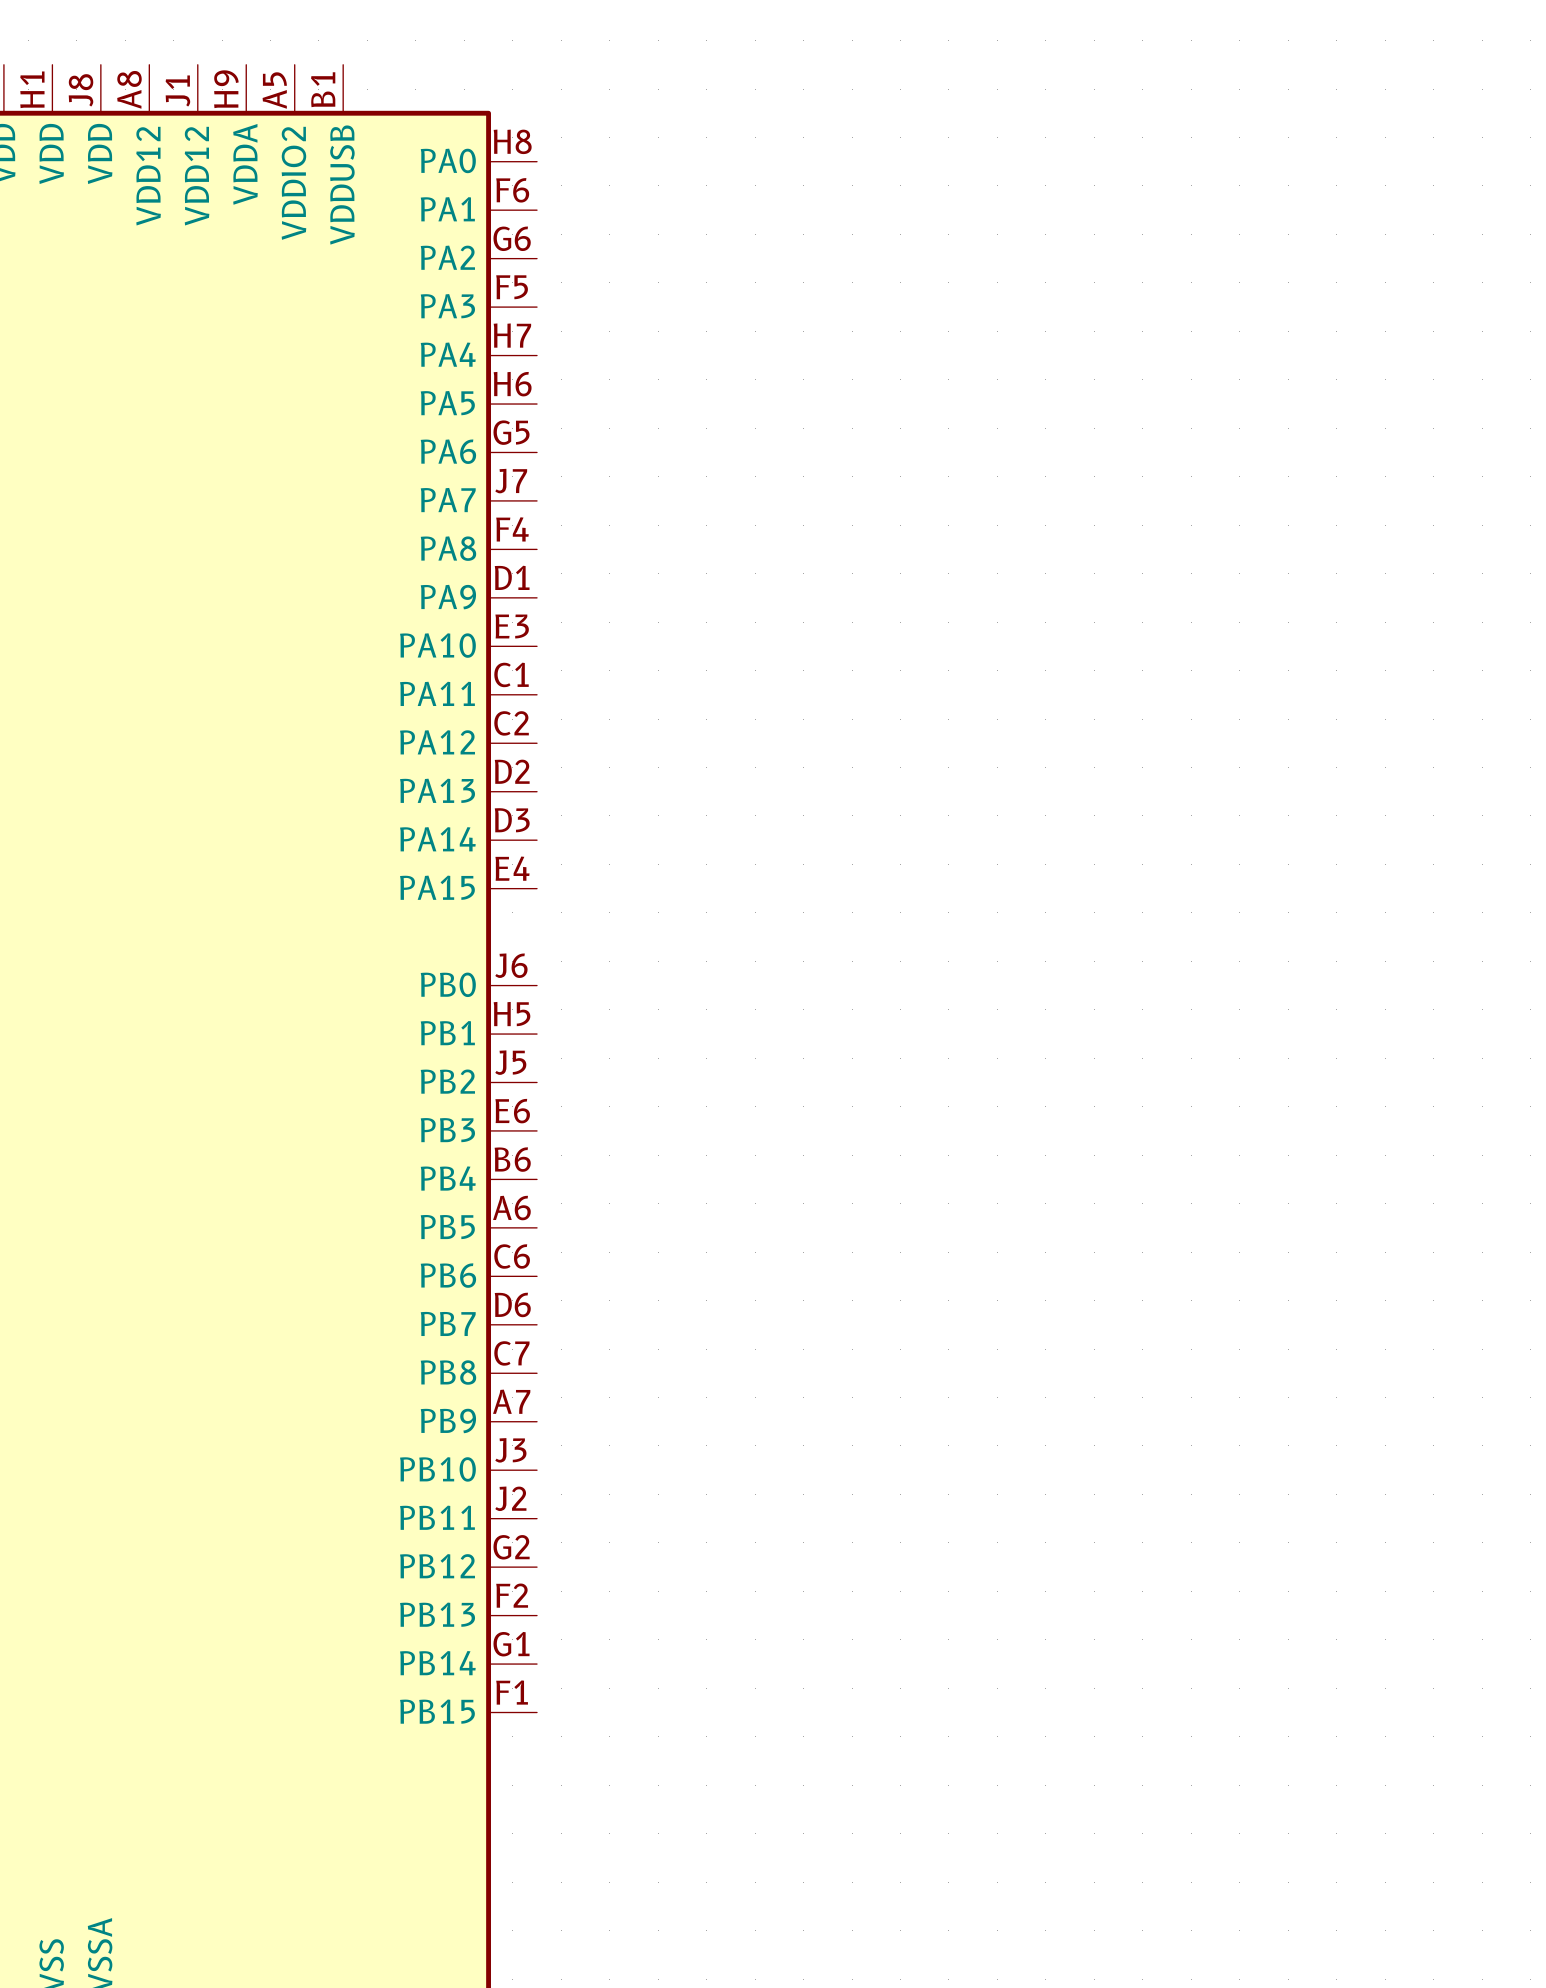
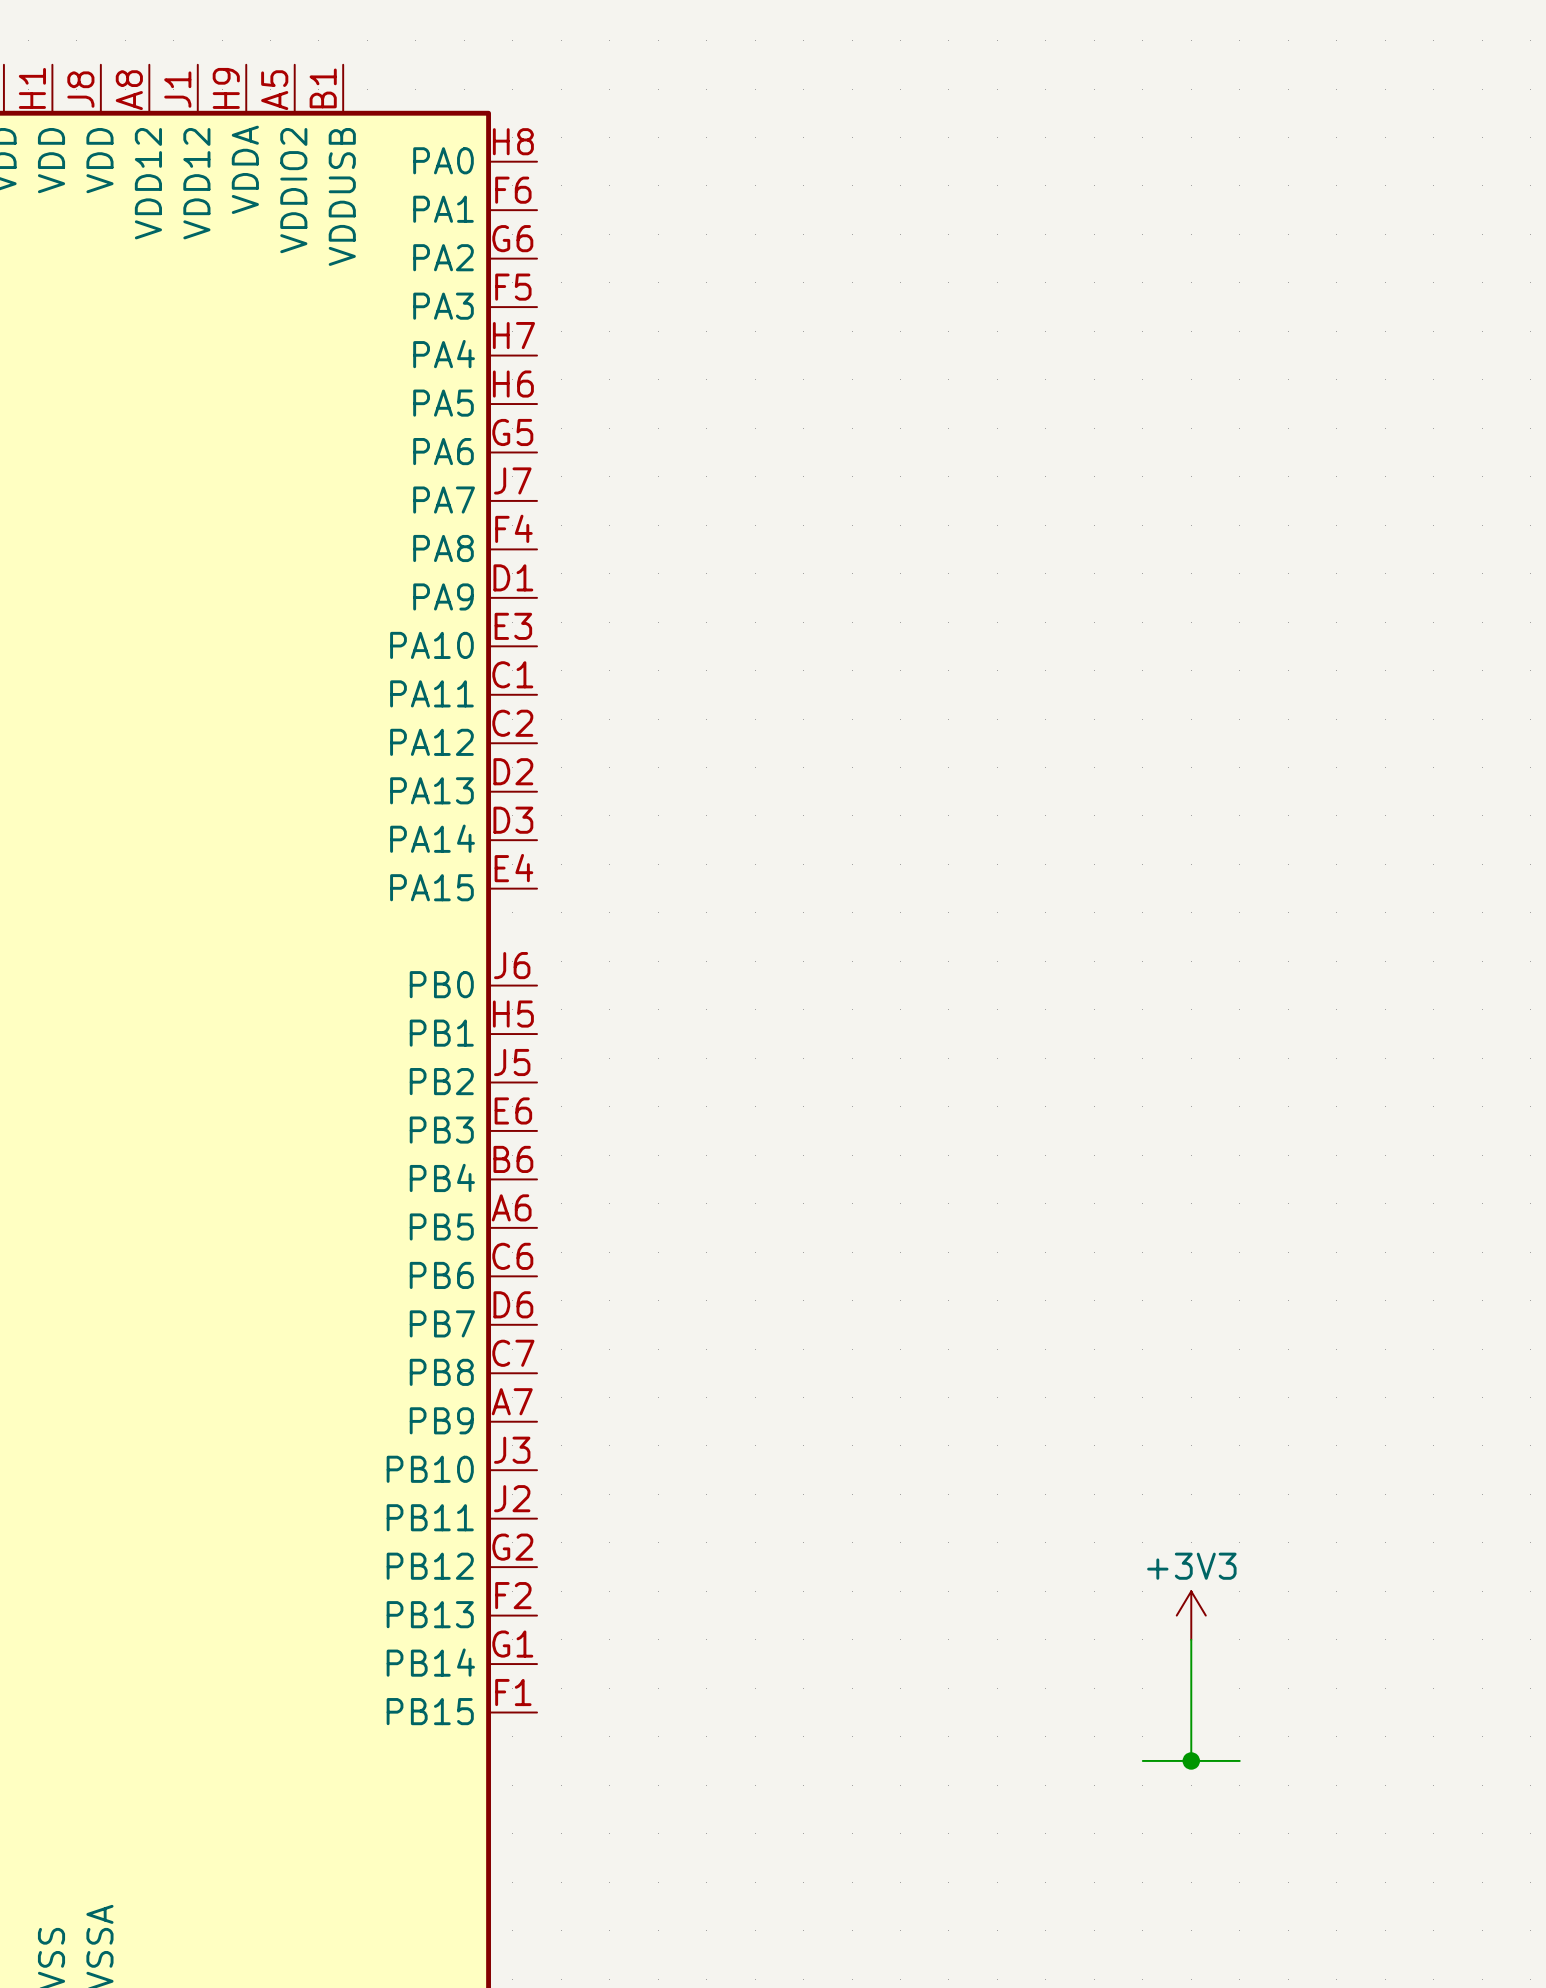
power symbol: none -> +3V3 (1191, 1615)
wire: none -> (1191, 1639) (1191, 1760)
wire: none -> (1142, 1760) (1239, 1760)
junction: none -> (1191, 1760)

